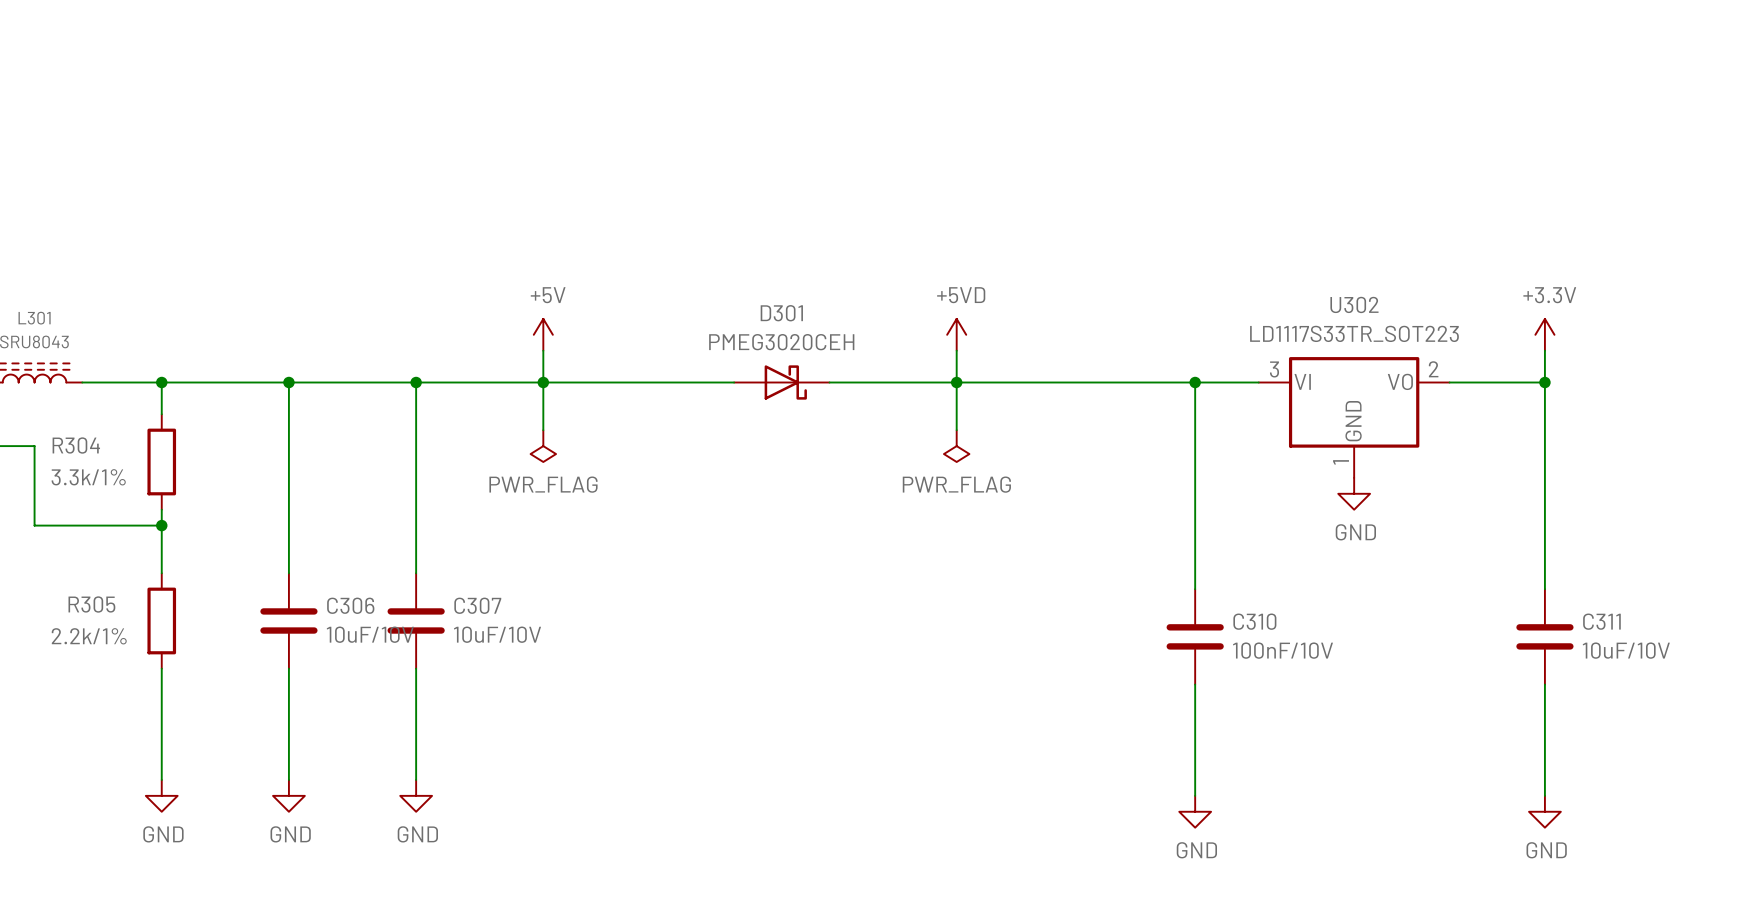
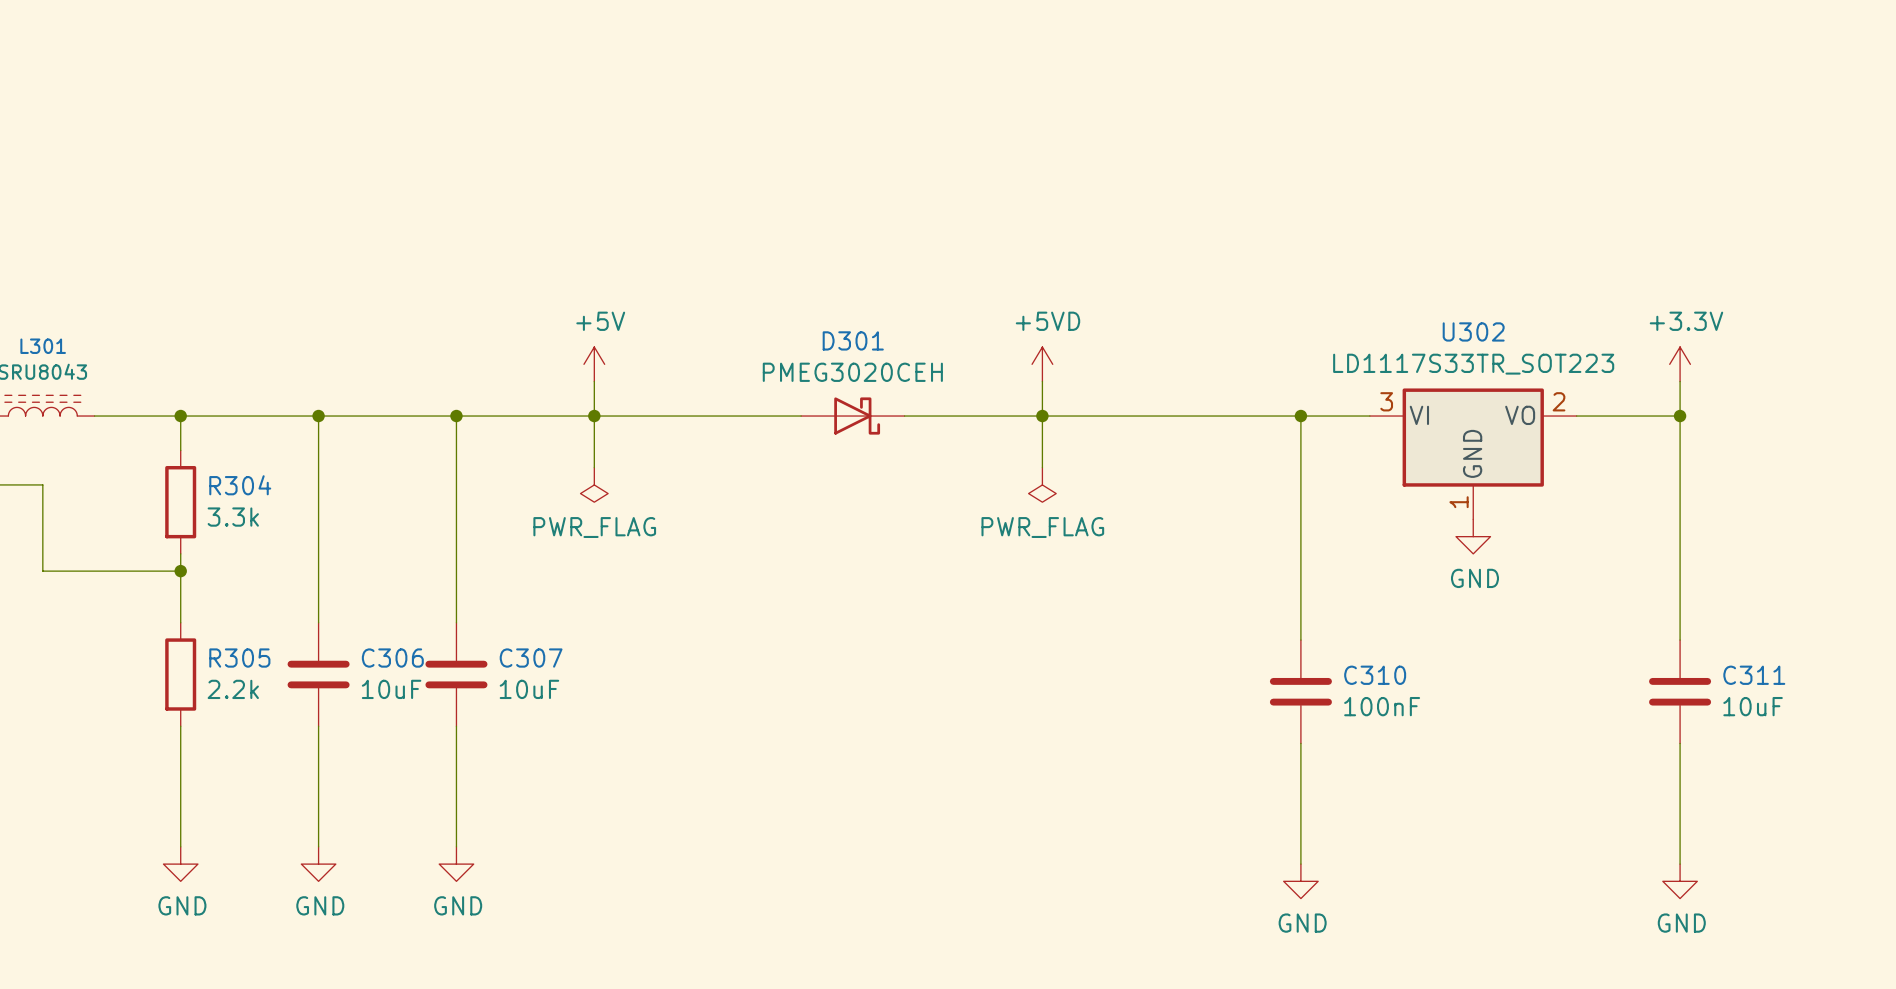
R304 name position: R304 (76, 445) -> R304 (240, 485)
R304 value: 3.3k/1% (88, 477) -> 3.3k (233, 517)
R305 name position: R305 (91, 604) -> R305 (239, 658)
C306 value: 10uF/10V (370, 634) -> 10uF (391, 689)
C307 value: 10uF/10V (497, 634) -> 10uF (529, 689)
R305 value: 2.2k/1% (89, 636) -> 2.2k (233, 689)
C310 value: 100nF/10V (1283, 650) -> 100nF (1382, 706)
C311 value: 10uF/10V (1626, 650) -> 10uF (1753, 706)

